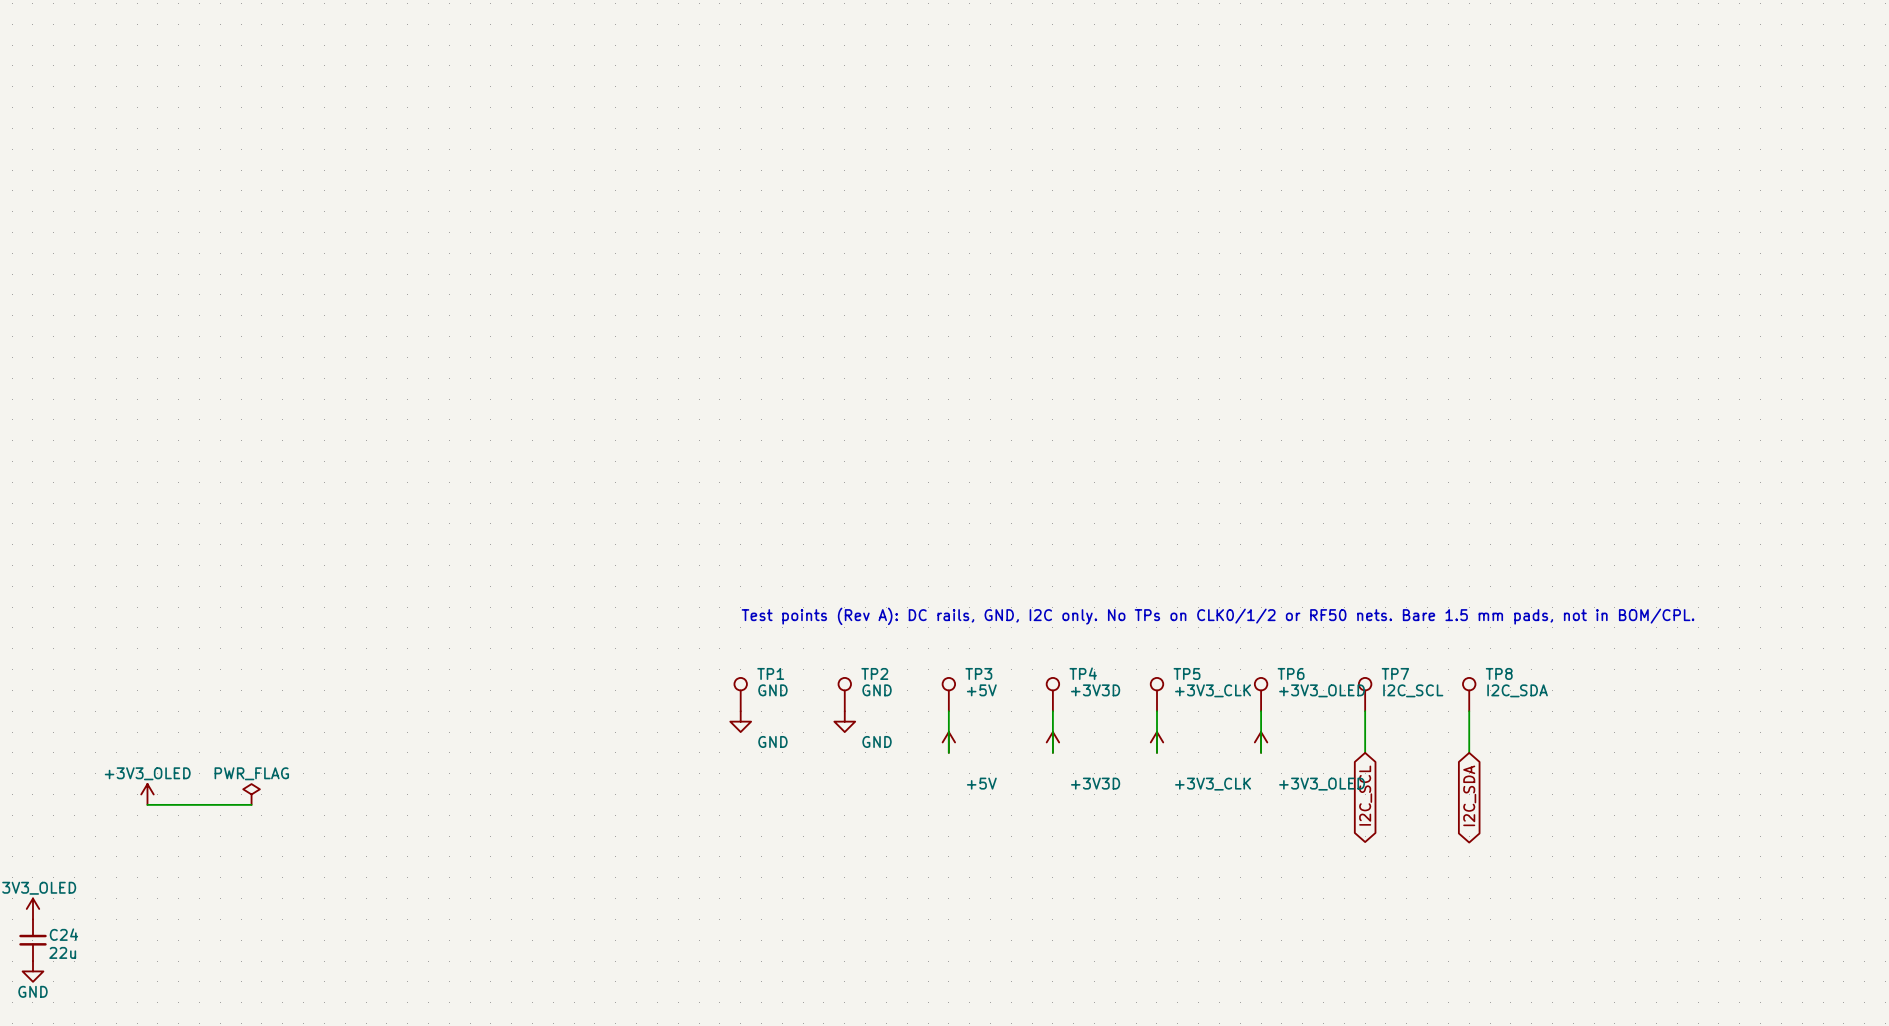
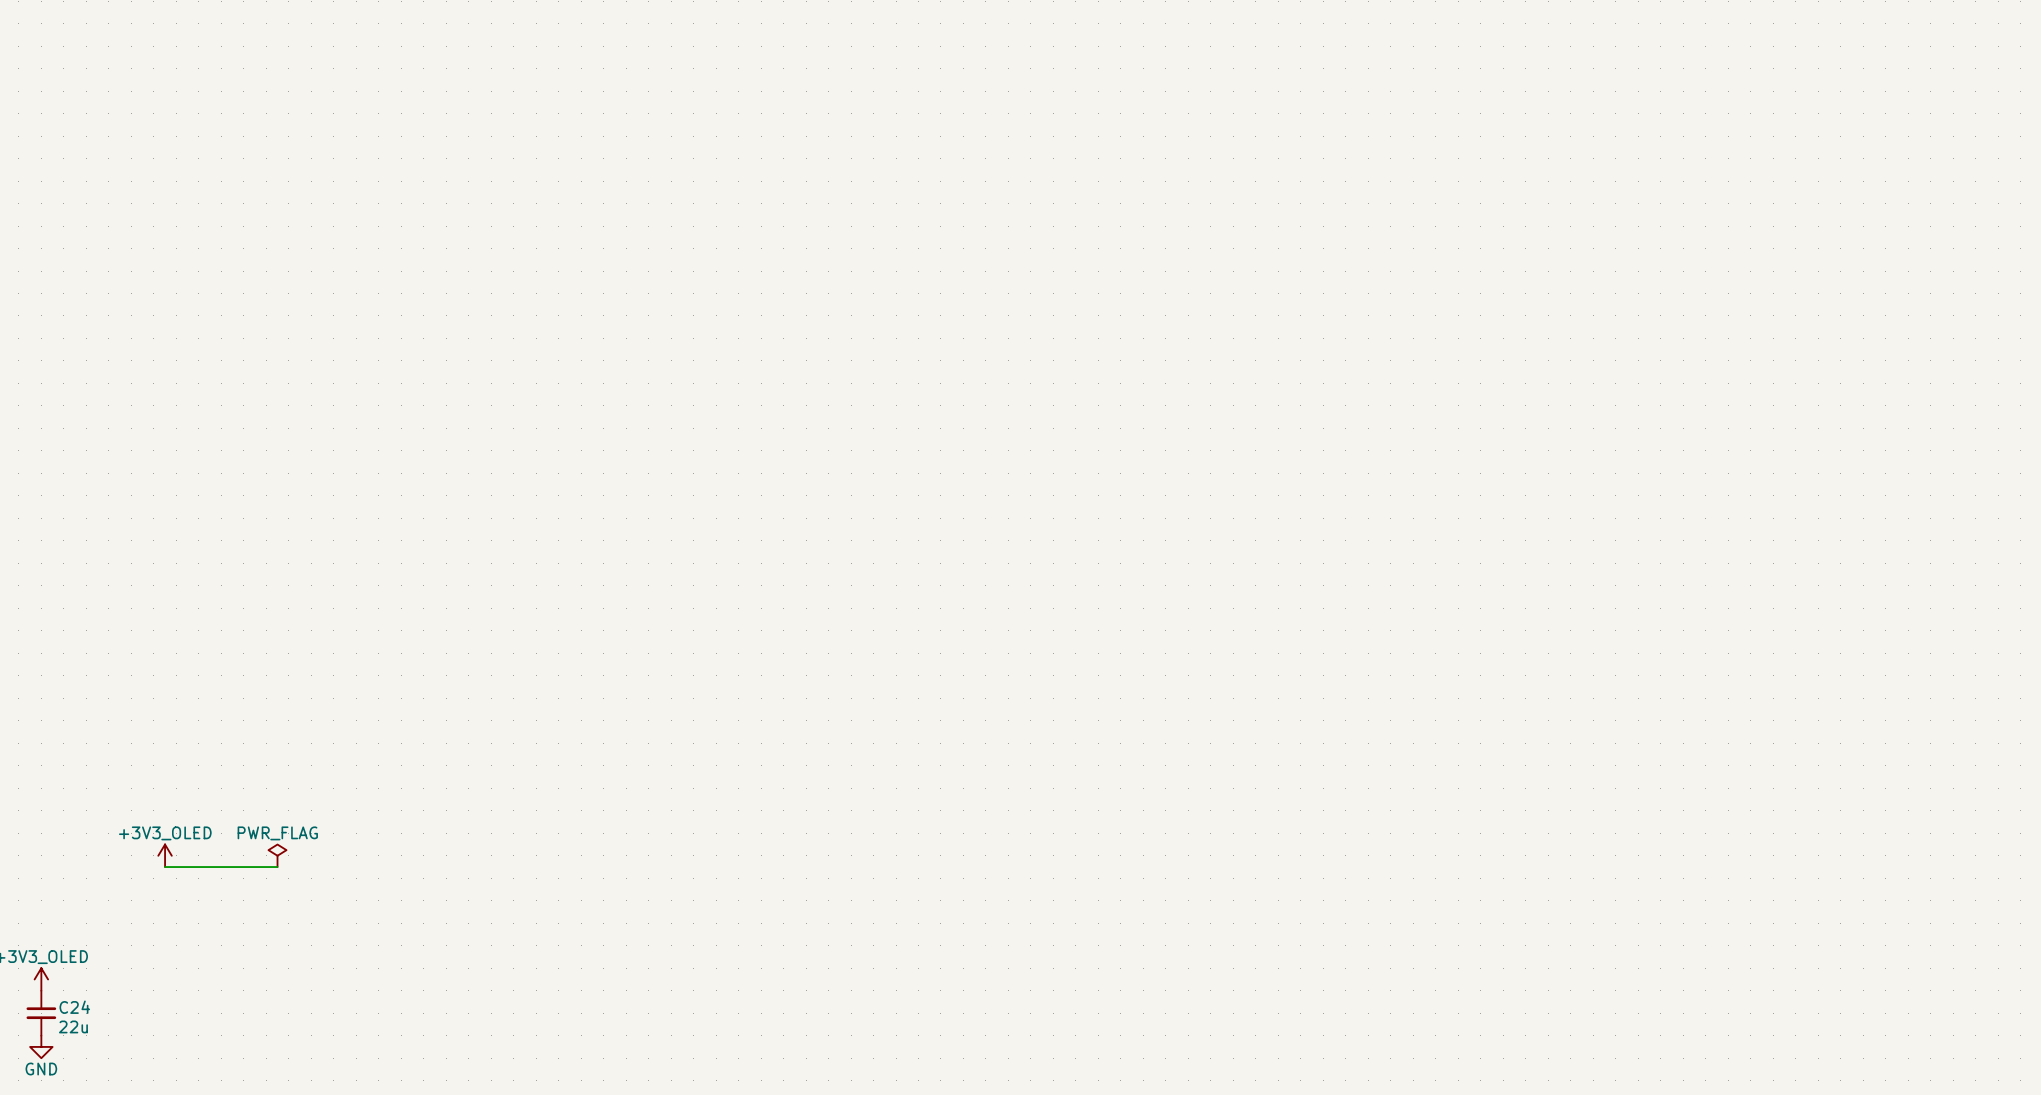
text: Test points (Rev A): DC rails, GND, I2C only. No TPs on CLK0/1/2 or RF50 nets. Bare 1.5 mm pads, not in BOM/CPL. (1218, 616) -> none
TP1: GND (740, 694) -> none
TP2: GND (844, 694) -> none
TP3: +5V (948, 694) -> none
TP4: +3V3D (1052, 694) -> none
TP5: +3V3_CLK (1156, 694) -> none
TP6: +3V3_OLED (1261, 694) -> none
TP7: I2C_SCL (1365, 694) -> none
TP8: I2C_SDA (1469, 694) -> none
wire: (948, 711) (948, 752) -> none
wire: (1052, 711) (1052, 752) -> none
wire: (1156, 711) (1156, 752) -> none
wire: (1261, 711) (1261, 752) -> none
wire: (1365, 711) (1365, 752) -> none
wire: (1469, 711) (1469, 752) -> none
power symbol: GND (740, 721) -> none
power symbol: GND (844, 721) -> none
power symbol: +5V (948, 742) -> none
power symbol: +3V3D (1052, 742) -> none
power symbol: +3V3_CLK (1156, 742) -> none
power symbol: +3V3_OLED (1261, 742) -> none
global label: I2C_SCL (1365, 795) -> none
global label: I2C_SDA (1469, 795) -> none

